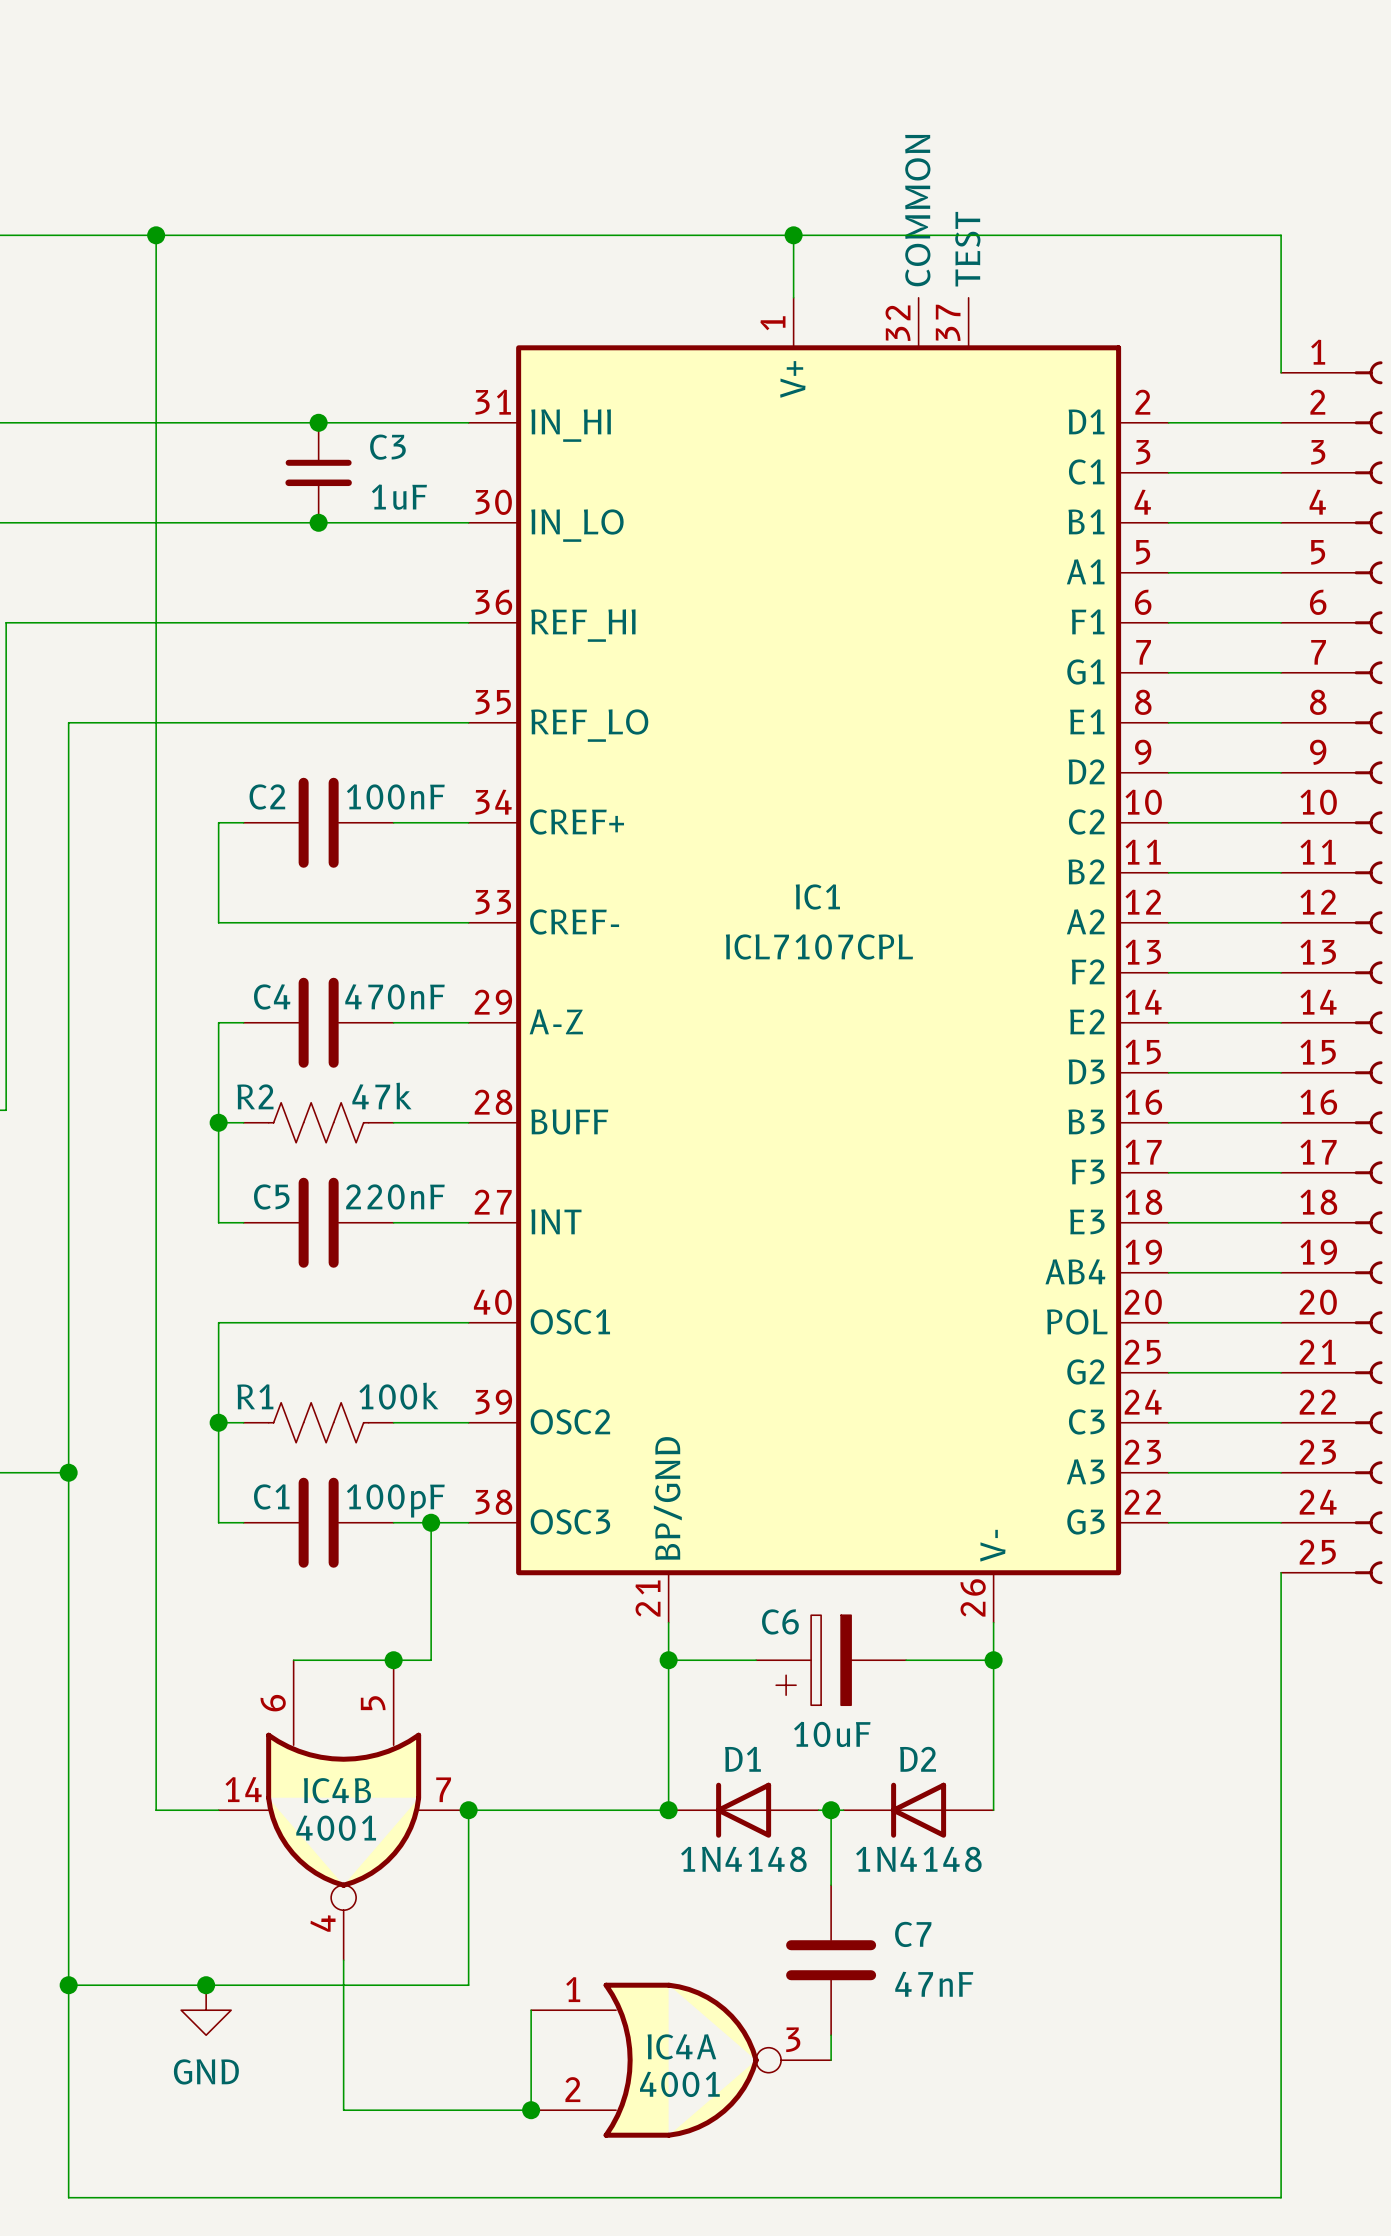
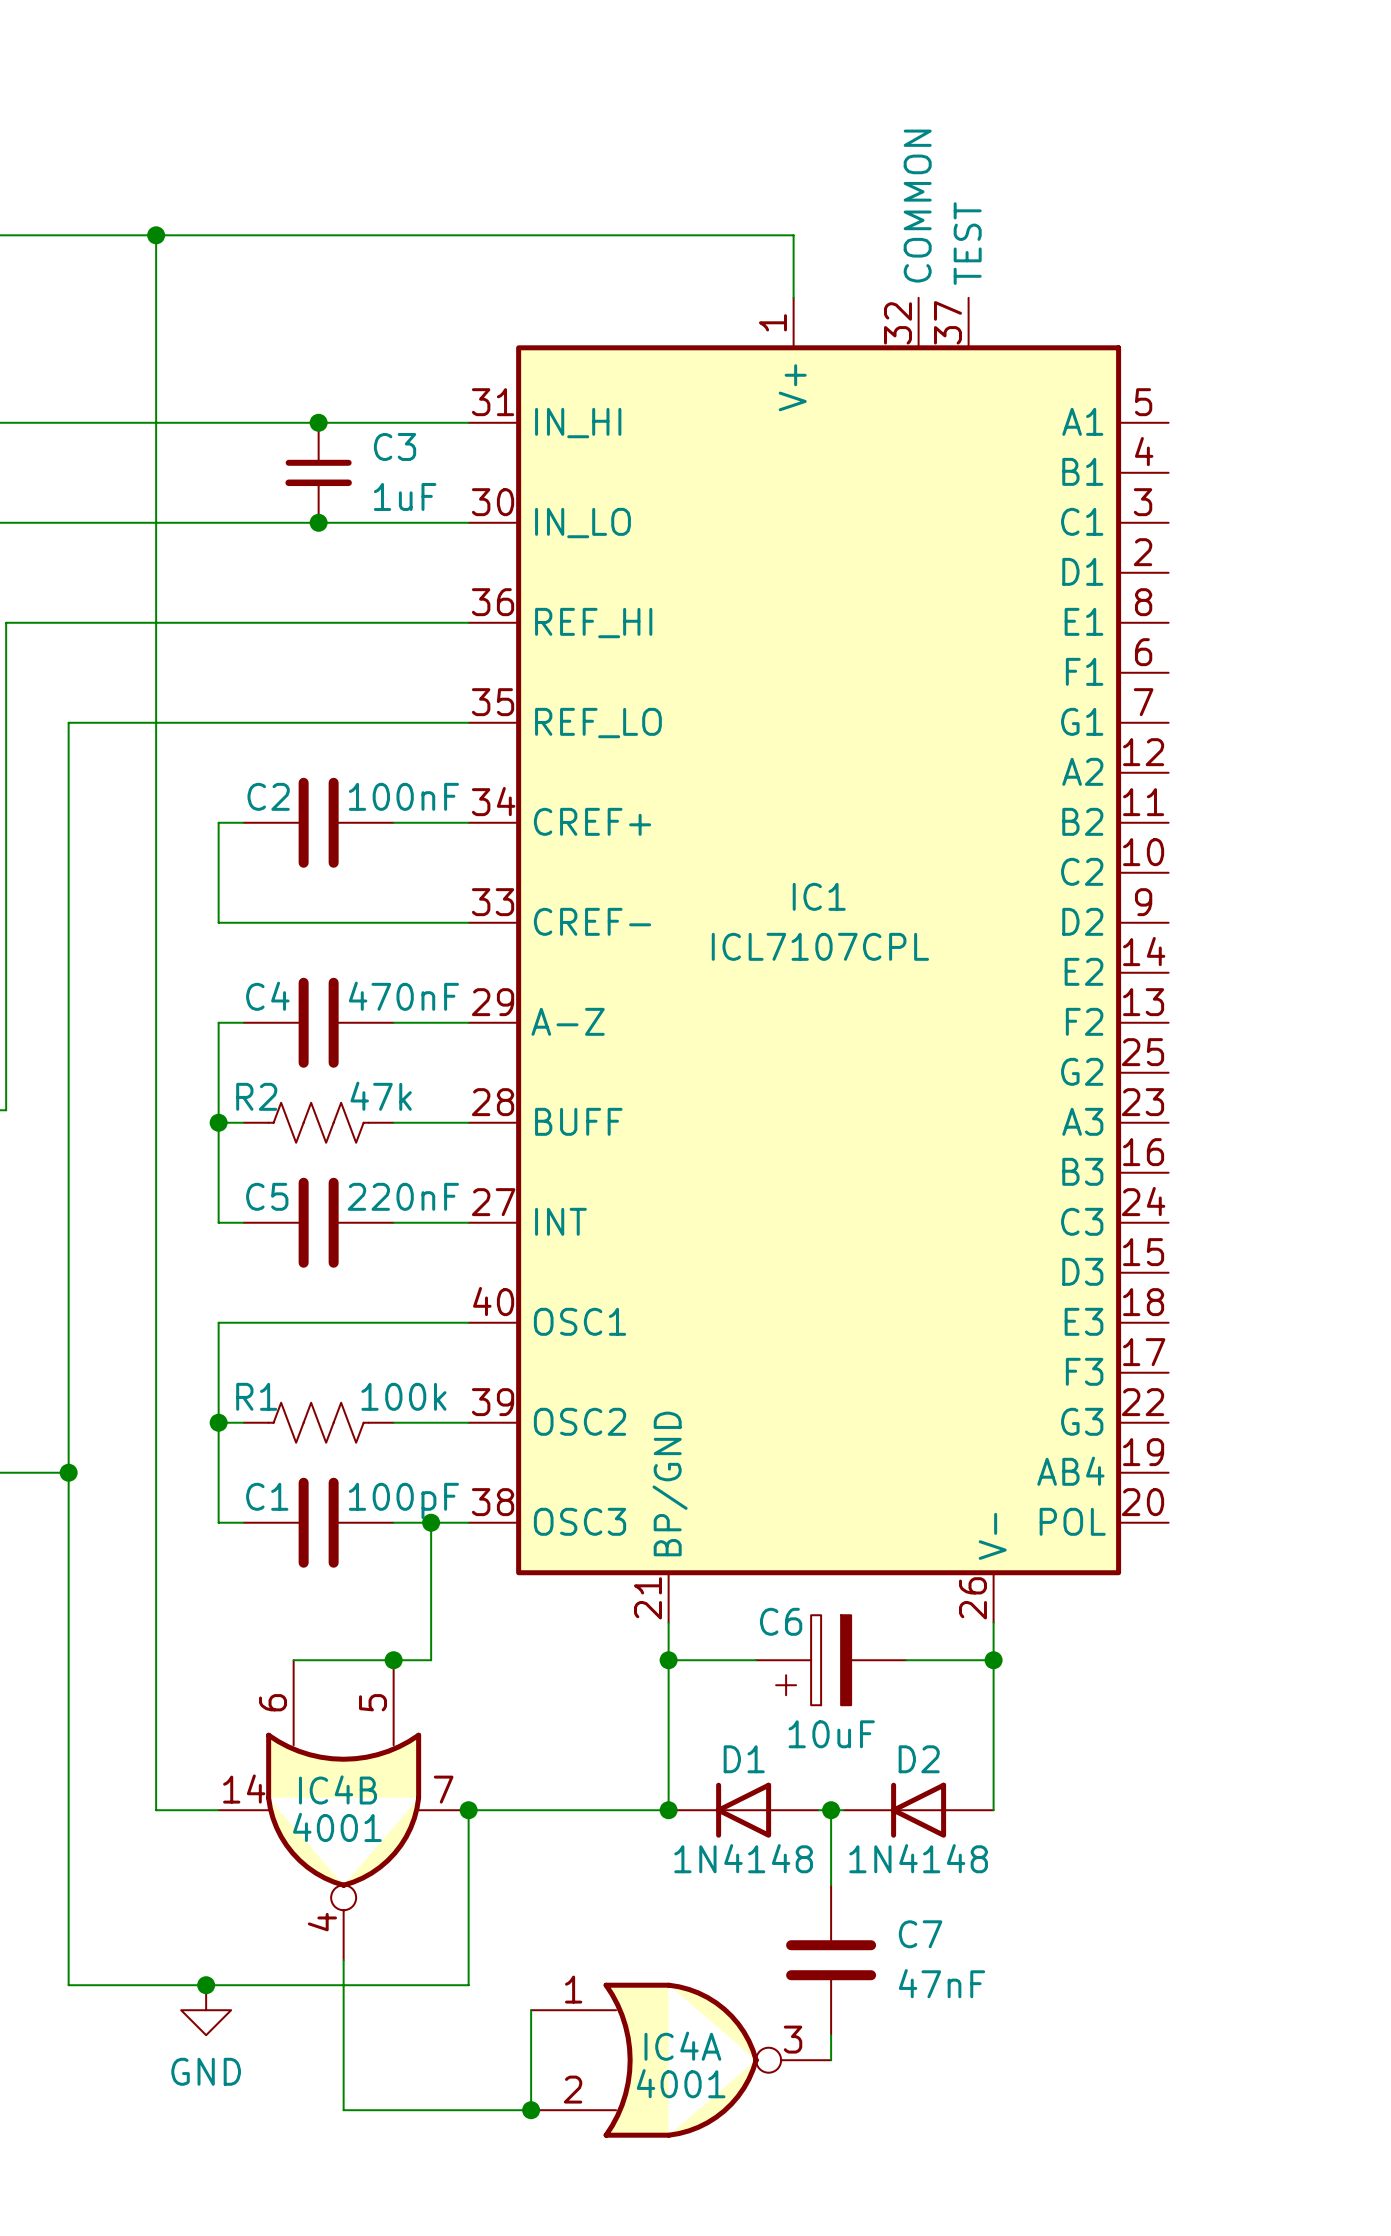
wire: (793, 235) (1281, 235) (1281, 372) -> none
junction: (793, 235) -> none
IC1 symbol: [468, 297, 1169, 1623] -> [468, 297, 1169, 1623]
wire: (1168, 422) (1281, 422) -> none
wire: (1168, 472) (1281, 472) -> none
wire: (1168, 522) (1281, 522) -> none
wire: (1168, 572) (1281, 572) -> none
wire: (1168, 622) (1281, 622) -> none
wire: (1168, 672) (1281, 672) -> none
wire: (1168, 722) (1281, 722) -> none
wire: (1168, 772) (1281, 772) -> none
wire: (1168, 822) (1281, 822) -> none
wire: (1168, 872) (1281, 872) -> none
wire: (1168, 922) (1281, 922) -> none
wire: (1168, 972) (1281, 972) -> none
part: (1331, 972) -> none
wire: (1168, 1022) (1281, 1022) -> none
wire: (1168, 1072) (1281, 1072) -> none
wire: (1168, 1122) (1281, 1122) -> none
wire: (1168, 1172) (1281, 1172) -> none
wire: (1168, 1222) (1281, 1222) -> none
wire: (1168, 1272) (1281, 1272) -> none
wire: (1168, 1322) (1281, 1322) -> none
wire: (1168, 1372) (1281, 1372) -> none
wire: (1168, 1422) (1281, 1422) -> none
wire: (1168, 1472) (1281, 1472) -> none
wire: (1168, 1522) (1281, 1522) -> none
wire: (1281, 1572) (1281, 2197) (68, 2197) (68, 1985) -> none
junction: (68, 1985) -> none

